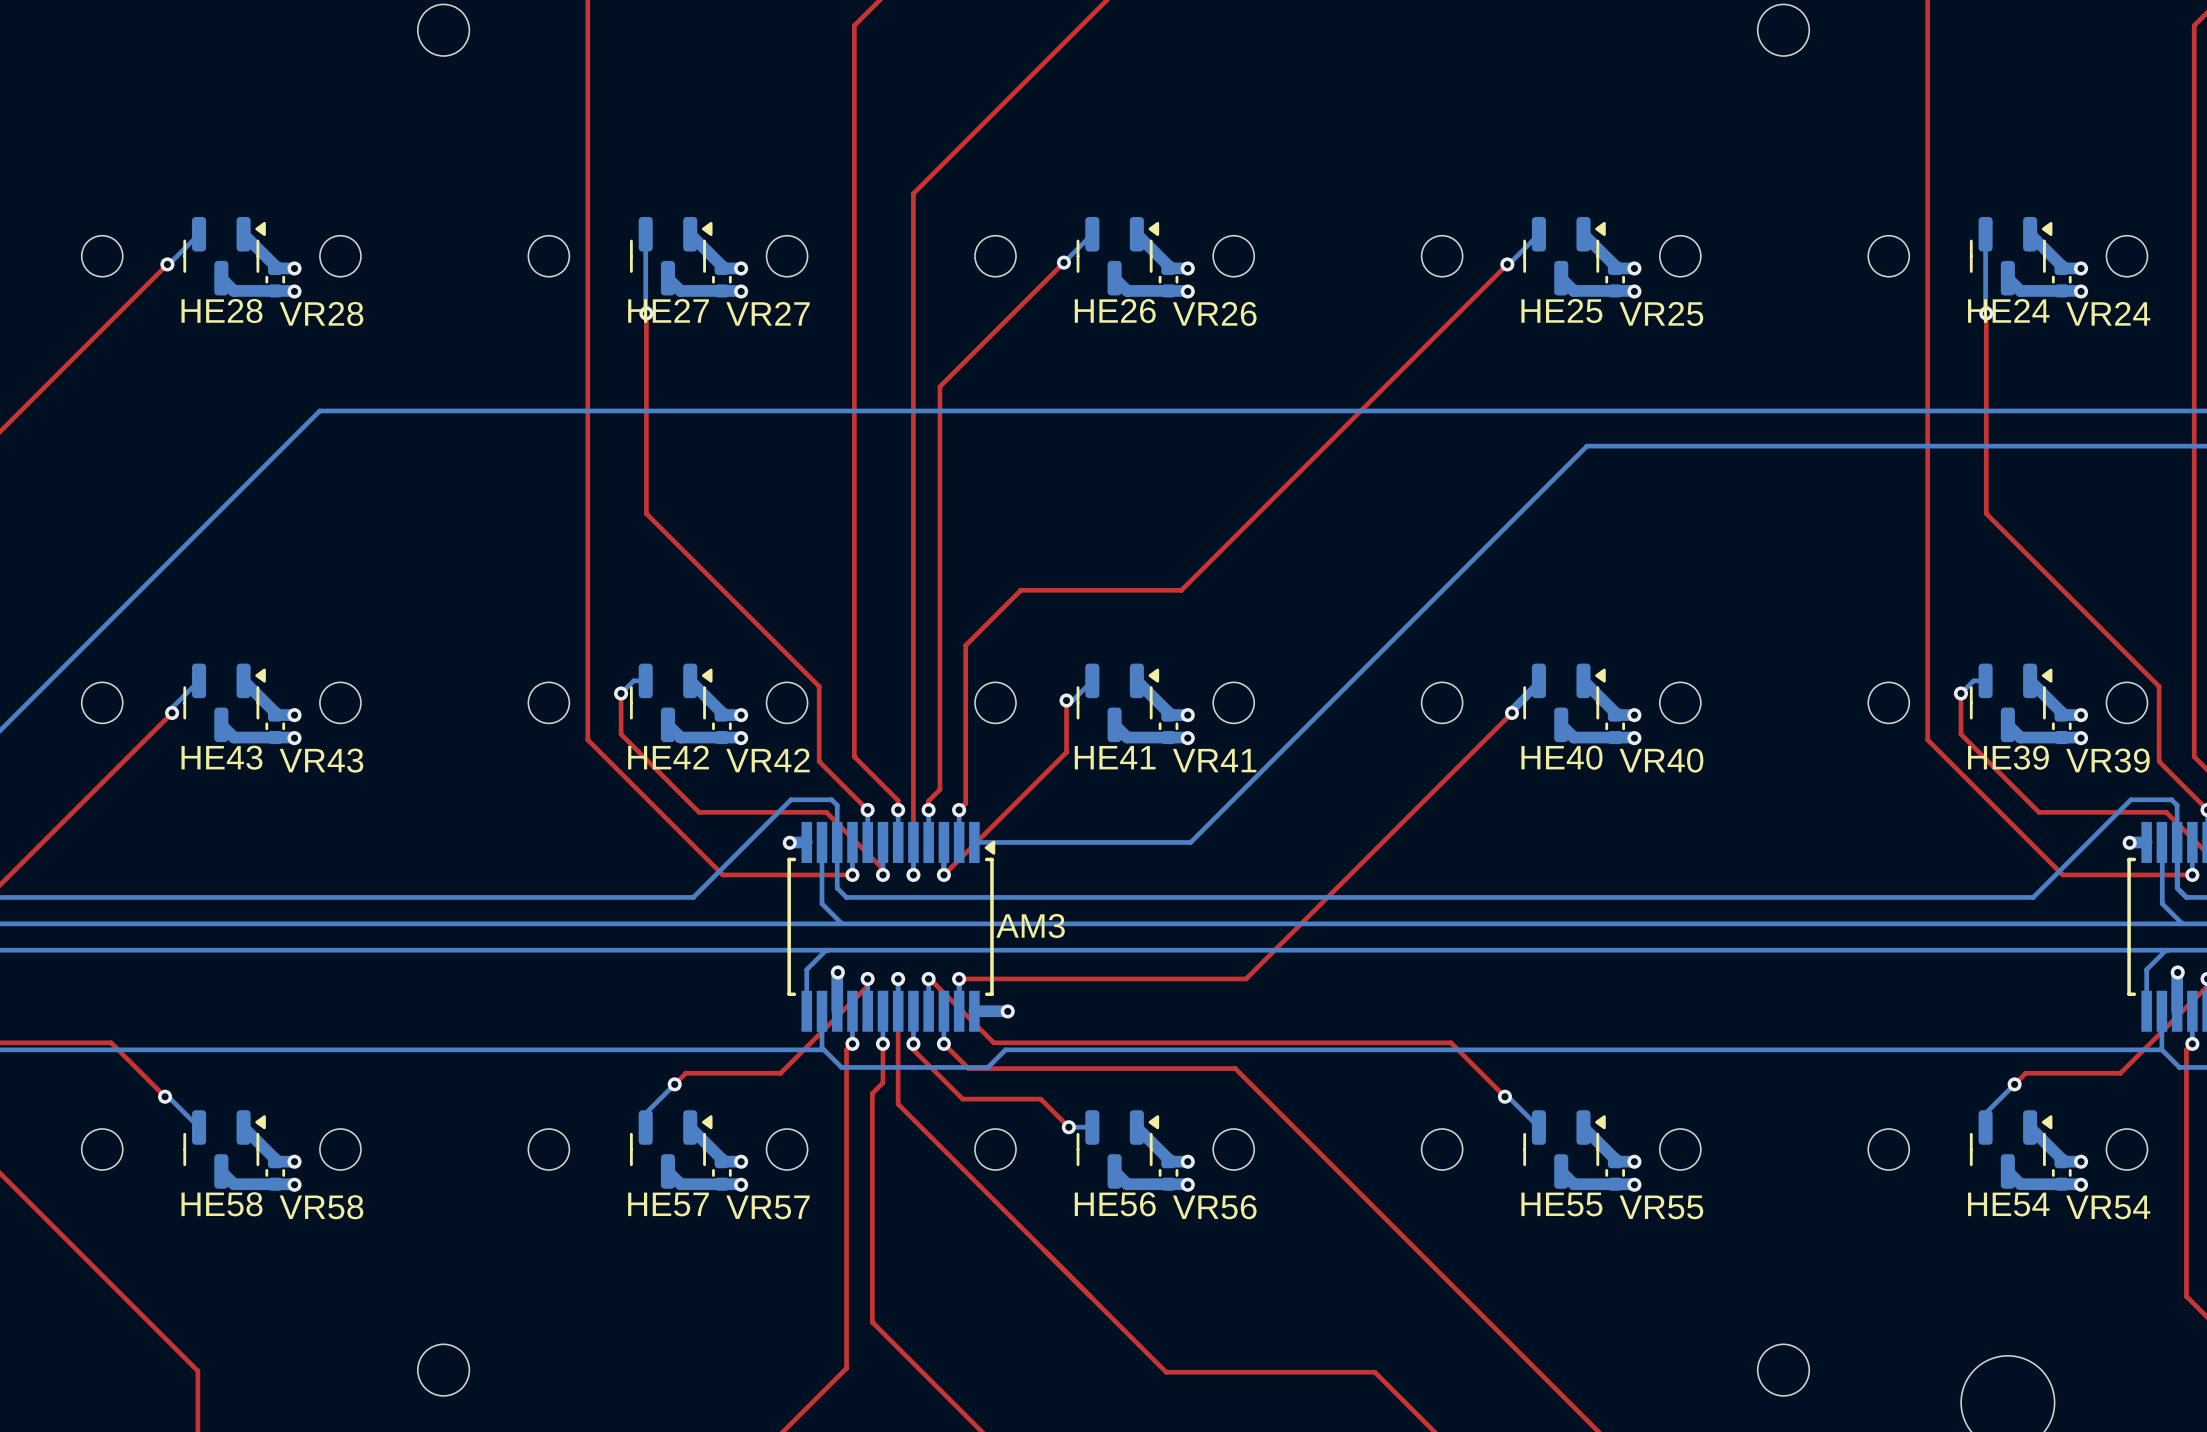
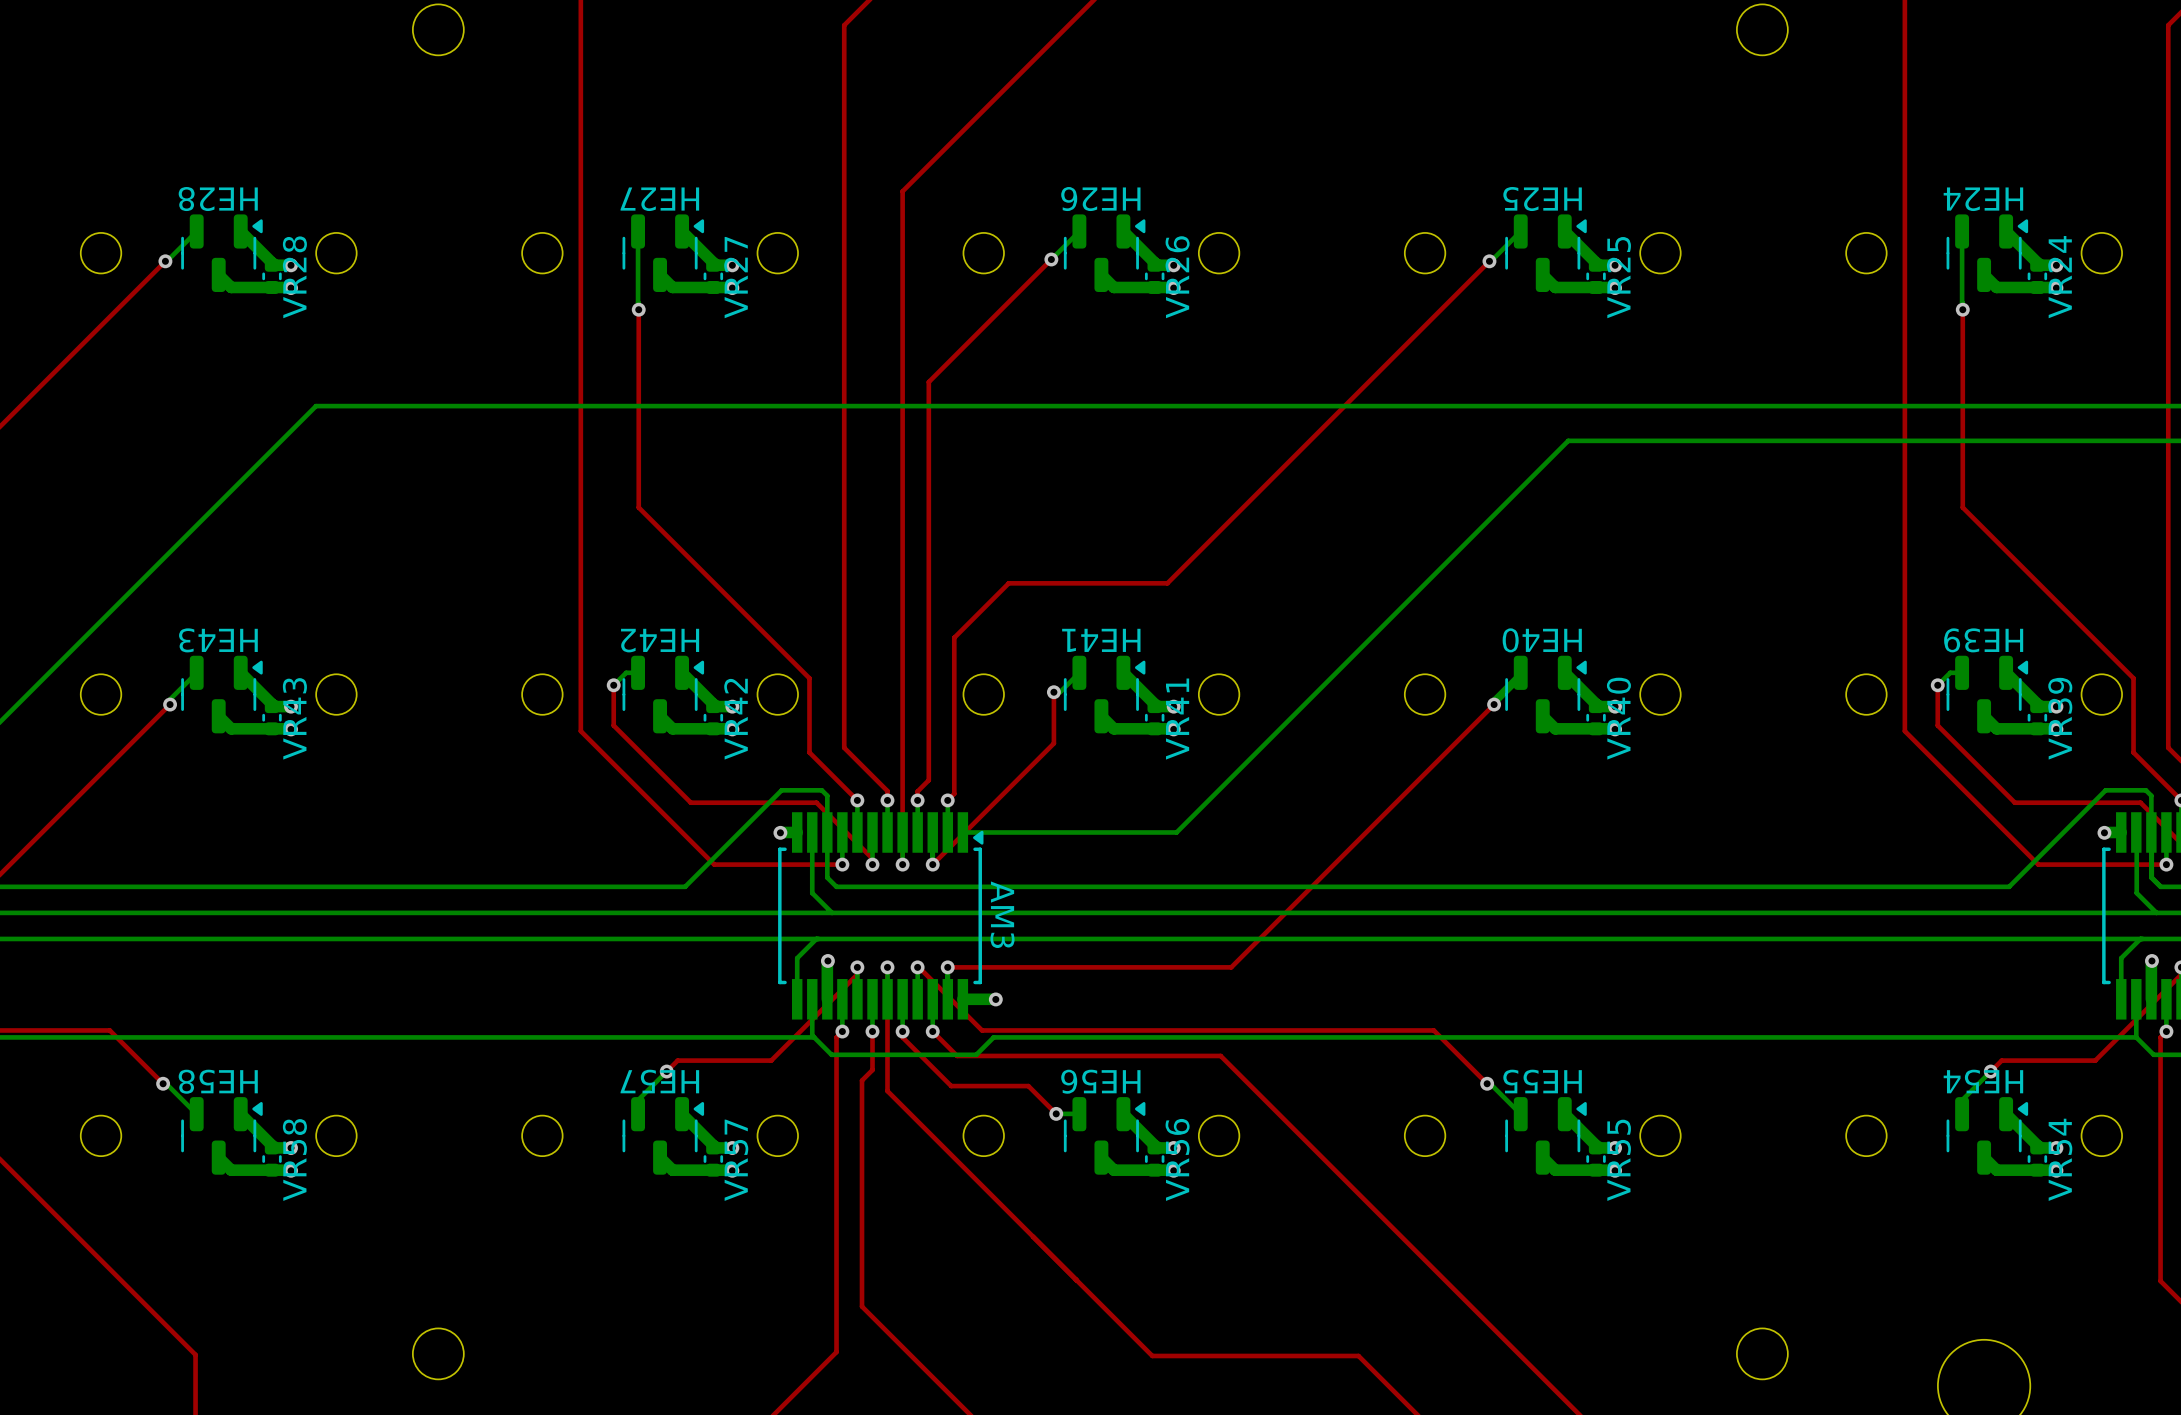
HE27 name rotation: 0° (668, 310) -> 180° (659, 199)
HE27 name position: HE27 (668, 310) -> HE27 (659, 199)
HE24 name rotation: 0° (2008, 310) -> 180° (1983, 199)
HE24 name position: HE24 (2008, 310) -> HE24 (1983, 199)
HE28 name rotation: 0° (221, 311) -> 180° (218, 199)
HE28 name position: HE28 (221, 311) -> HE28 (218, 199)
HE26 name rotation: 0° (1115, 311) -> 180° (1100, 199)
HE26 name position: HE26 (1115, 311) -> HE26 (1100, 199)
HE25 name rotation: 0° (1561, 311) -> 180° (1542, 199)
HE25 name position: HE25 (1561, 311) -> HE25 (1542, 199)
VR28 name rotation: 0° (321, 313) -> 90° counterclockwise (294, 277)
VR27 name rotation: 0° (768, 313) -> 90° counterclockwise (736, 277)
VR26 name rotation: 0° (1214, 313) -> 90° counterclockwise (1177, 277)
VR25 name rotation: 0° (1661, 313) -> 90° counterclockwise (1618, 277)
VR24 name rotation: 0° (2108, 313) -> 90° counterclockwise (2060, 277)
HE43 name rotation: 0° (221, 757) -> 180° (218, 640)
HE43 name position: HE43 (221, 757) -> HE43 (218, 640)
HE42 name rotation: 0° (668, 757) -> 180° (660, 640)
HE42 name position: HE42 (668, 757) -> HE42 (660, 640)
HE41 name rotation: 0° (1115, 757) -> 180° (1101, 640)
HE41 name position: HE41 (1115, 757) -> HE41 (1101, 640)
HE40 name rotation: 0° (1561, 757) -> 180° (1542, 640)
HE40 name position: HE40 (1561, 757) -> HE40 (1542, 640)
HE39 name rotation: 0° (2008, 757) -> 180° (1983, 640)
HE39 name position: HE39 (2008, 757) -> HE39 (1983, 640)
VR43 name rotation: 0° (321, 760) -> 90° counterclockwise (294, 718)
VR42 name rotation: 0° (768, 760) -> 90° counterclockwise (736, 719)
VR41 name rotation: 0° (1214, 760) -> 90° counterclockwise (1177, 719)
VR40 name rotation: 0° (1661, 760) -> 90° counterclockwise (1618, 718)
VR39 name rotation: 0° (2107, 760) -> 90° counterclockwise (2060, 718)
AM3 name rotation: 0° (1030, 925) -> 90° clockwise (1002, 914)
HE58 name rotation: 0° (221, 1204) -> 180° (218, 1081)
HE58 name position: HE58 (221, 1204) -> HE58 (218, 1081)
HE57 name rotation: 0° (668, 1204) -> 180° (659, 1081)
HE57 name position: HE57 (668, 1204) -> HE57 (659, 1081)
HE56 name rotation: 0° (1115, 1204) -> 180° (1100, 1081)
HE56 name position: HE56 (1115, 1204) -> HE56 (1100, 1081)
HE55 name rotation: 0° (1561, 1204) -> 180° (1542, 1081)
HE55 name position: HE55 (1561, 1204) -> HE55 (1542, 1081)
HE54 name rotation: 0° (2008, 1204) -> 180° (1983, 1081)
HE54 name position: HE54 (2008, 1204) -> HE54 (1983, 1081)
VR58 name rotation: 0° (321, 1207) -> 90° counterclockwise (294, 1160)
VR57 name rotation: 0° (768, 1207) -> 90° counterclockwise (736, 1160)
VR56 name rotation: 0° (1214, 1207) -> 90° counterclockwise (1177, 1159)
VR55 name rotation: 0° (1661, 1207) -> 90° counterclockwise (1619, 1160)
VR54 name rotation: 0° (2108, 1207) -> 90° counterclockwise (2060, 1159)

